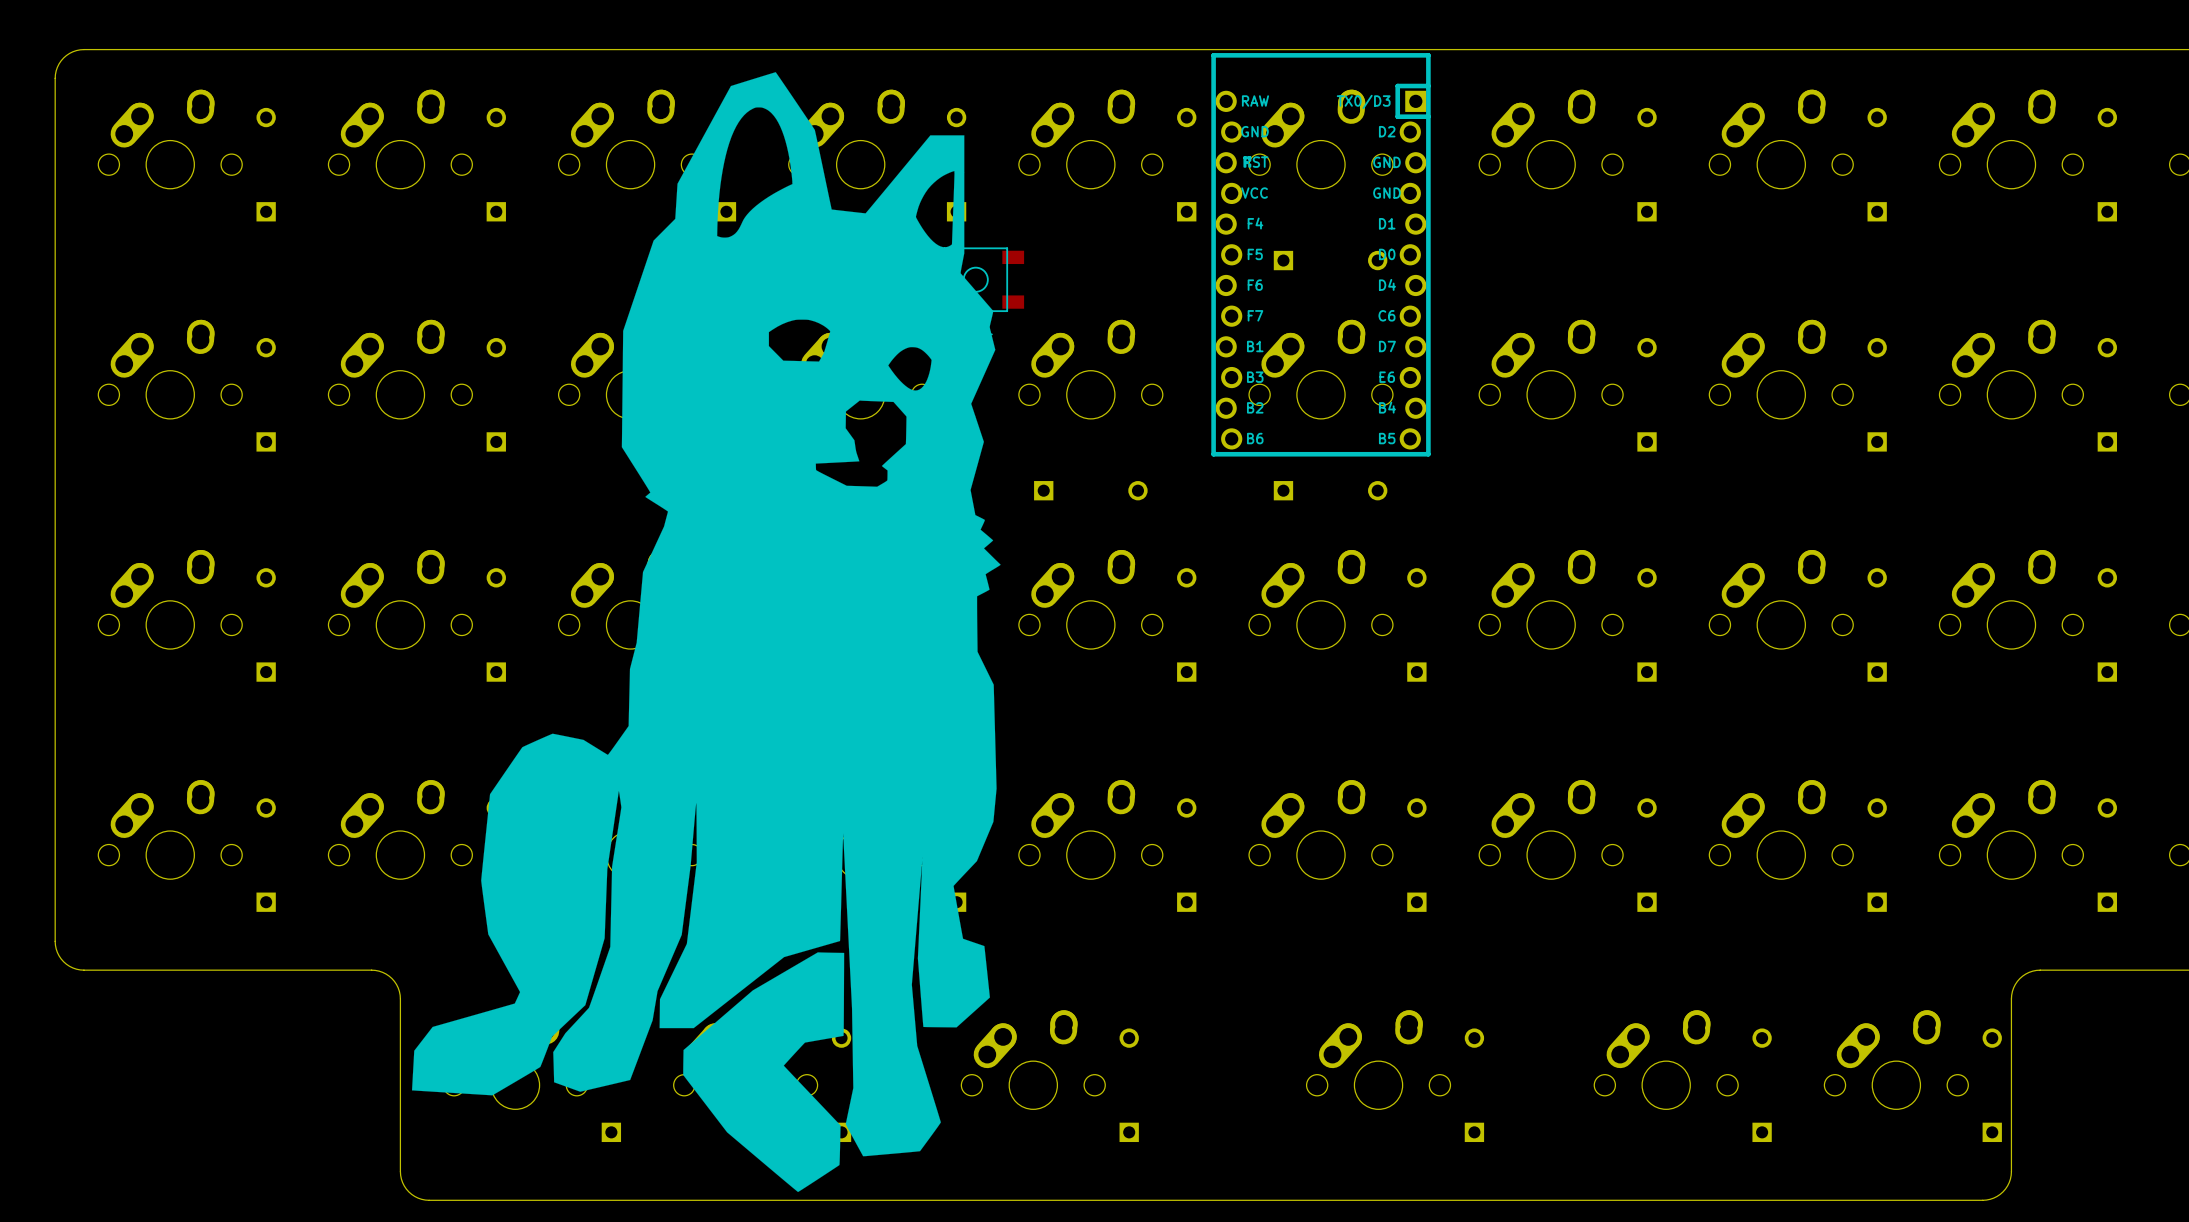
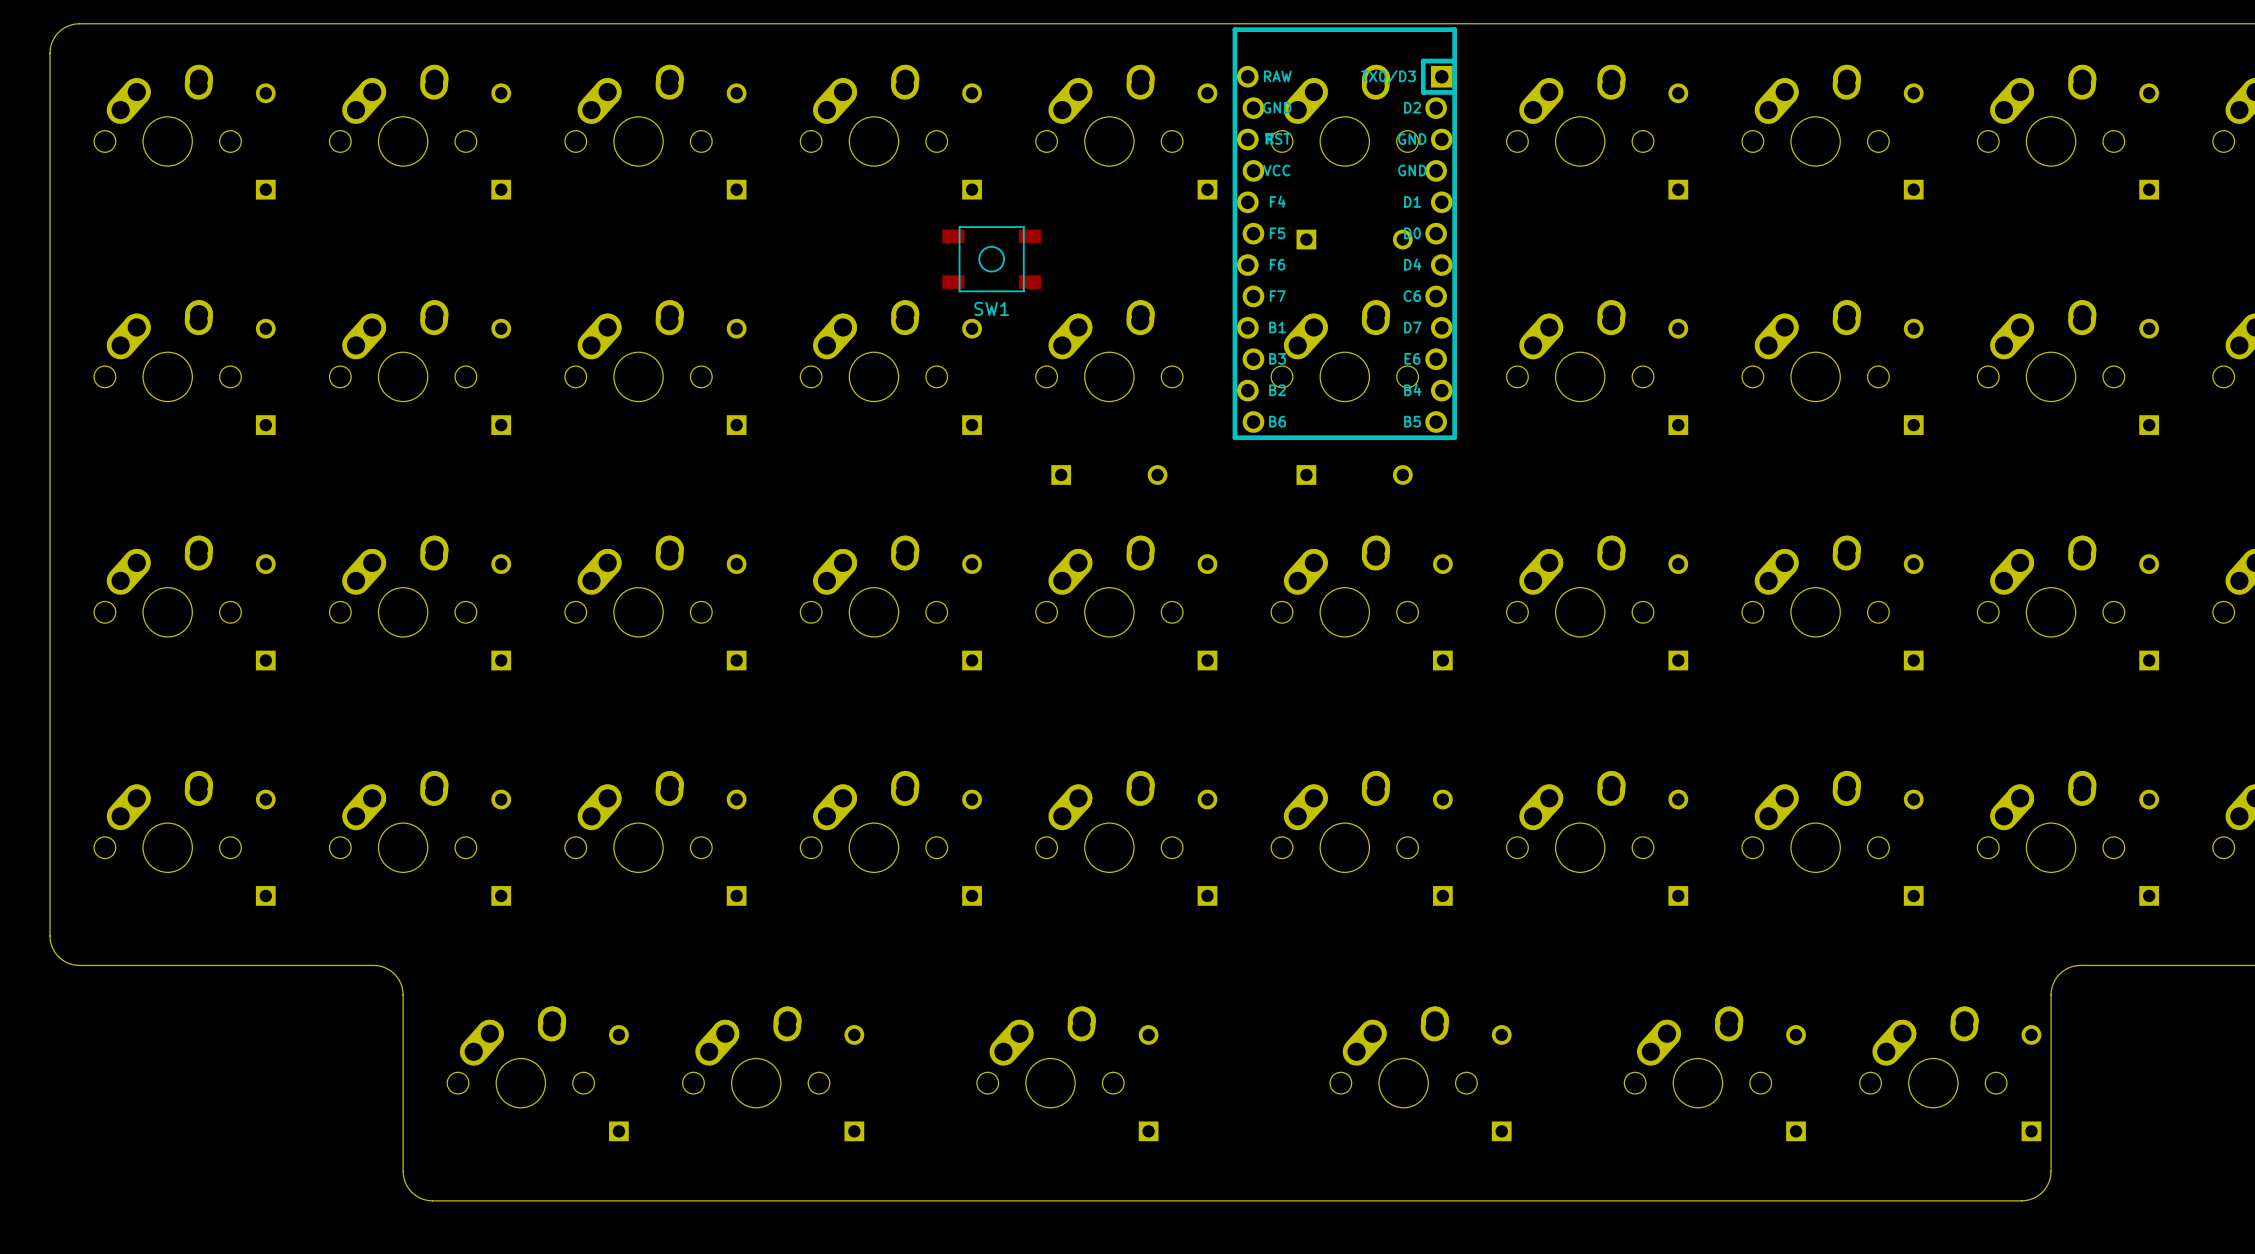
drawing: [411, 72, 1001, 1193] -> none

